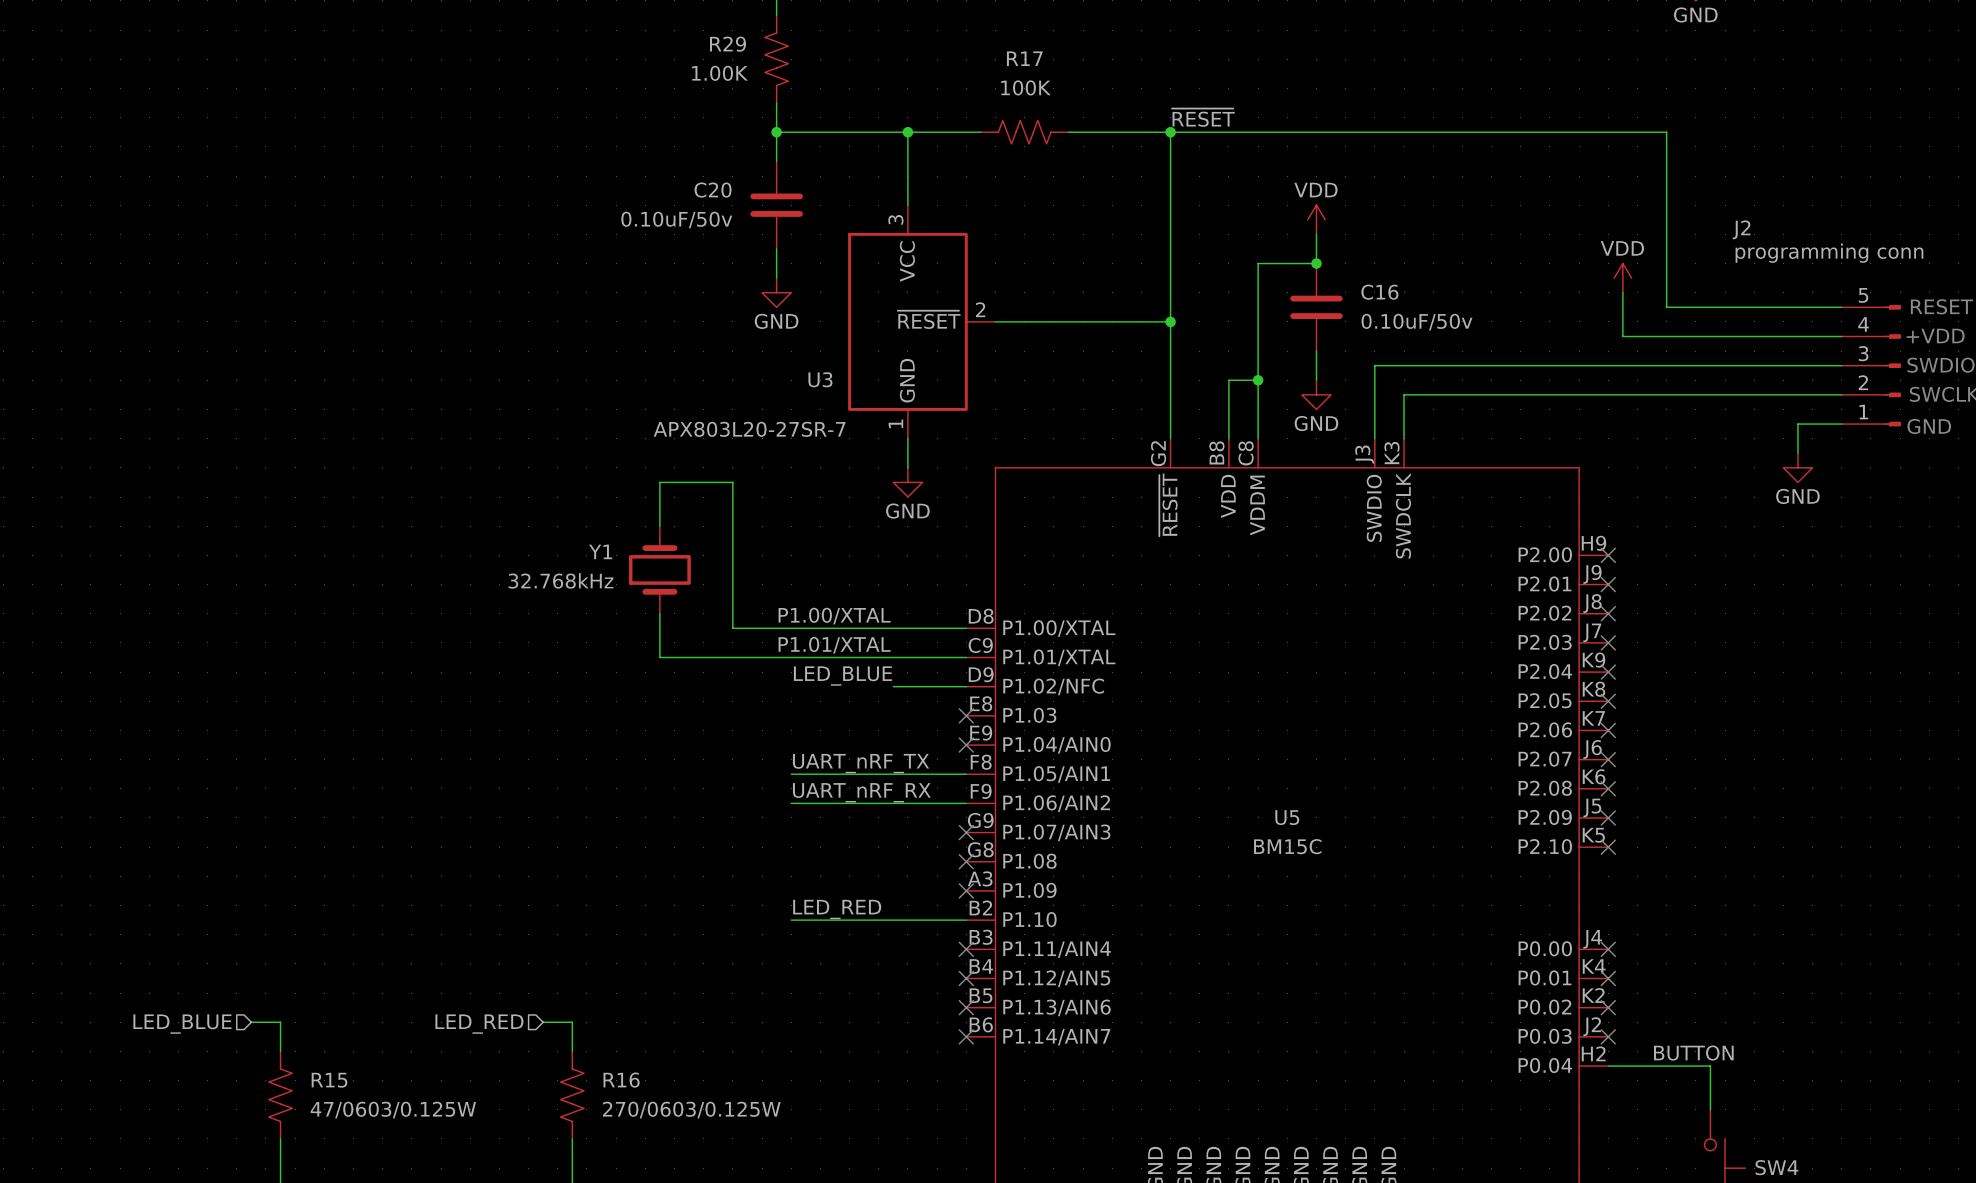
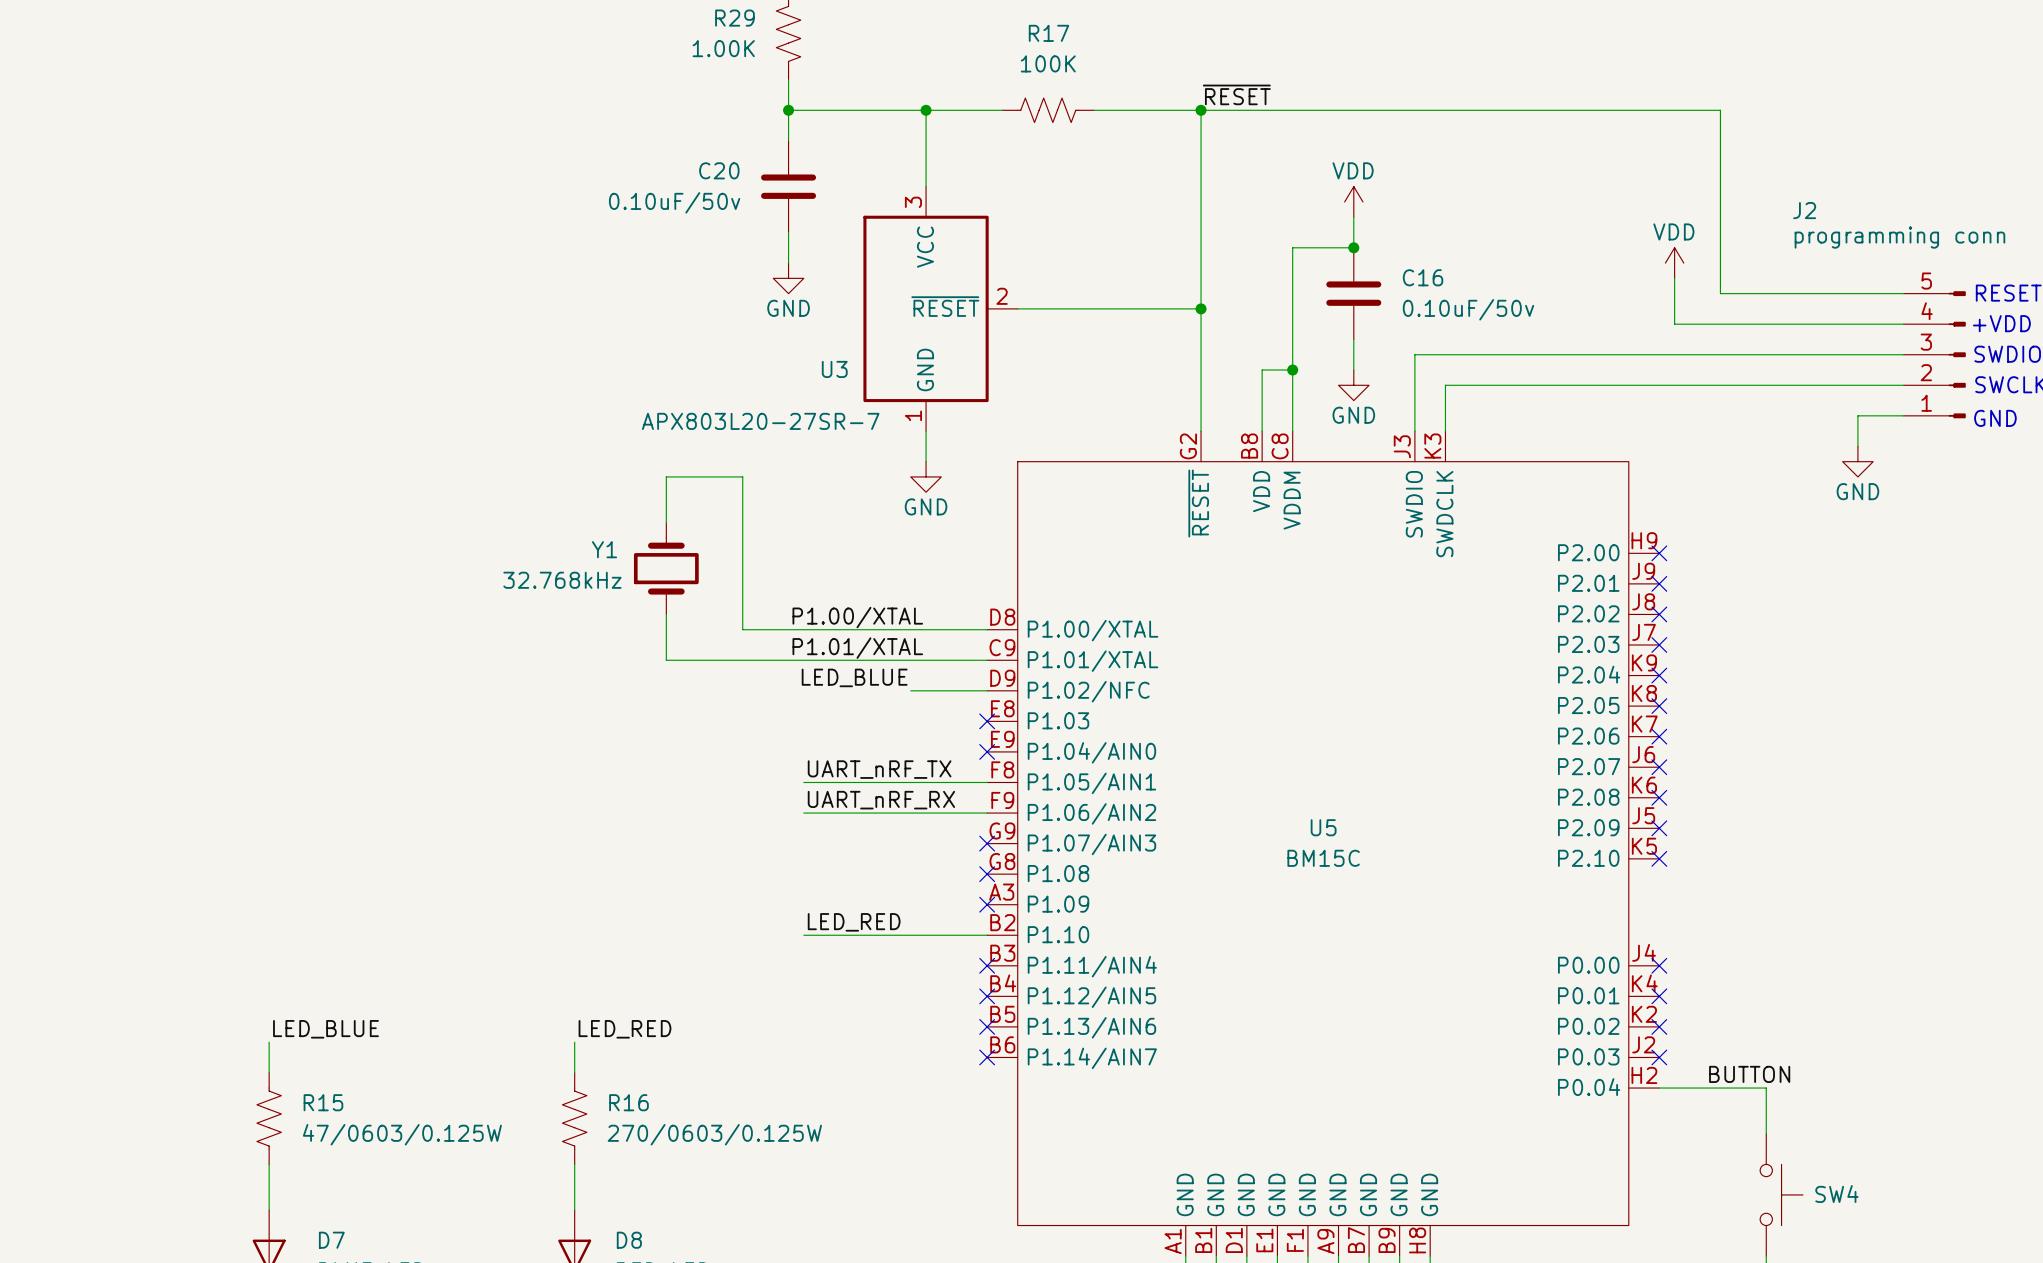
label: none -> LED_BLUE (326, 1029)
label: none -> LED_RED (624, 1029)
wire: (251, 1022) (280, 1022) -> none
wire: (543, 1022) (572, 1022) -> none
hierarchical label: LED_BLUE (182, 1024) -> none
hierarchical label: LED_RED (479, 1024) -> none

